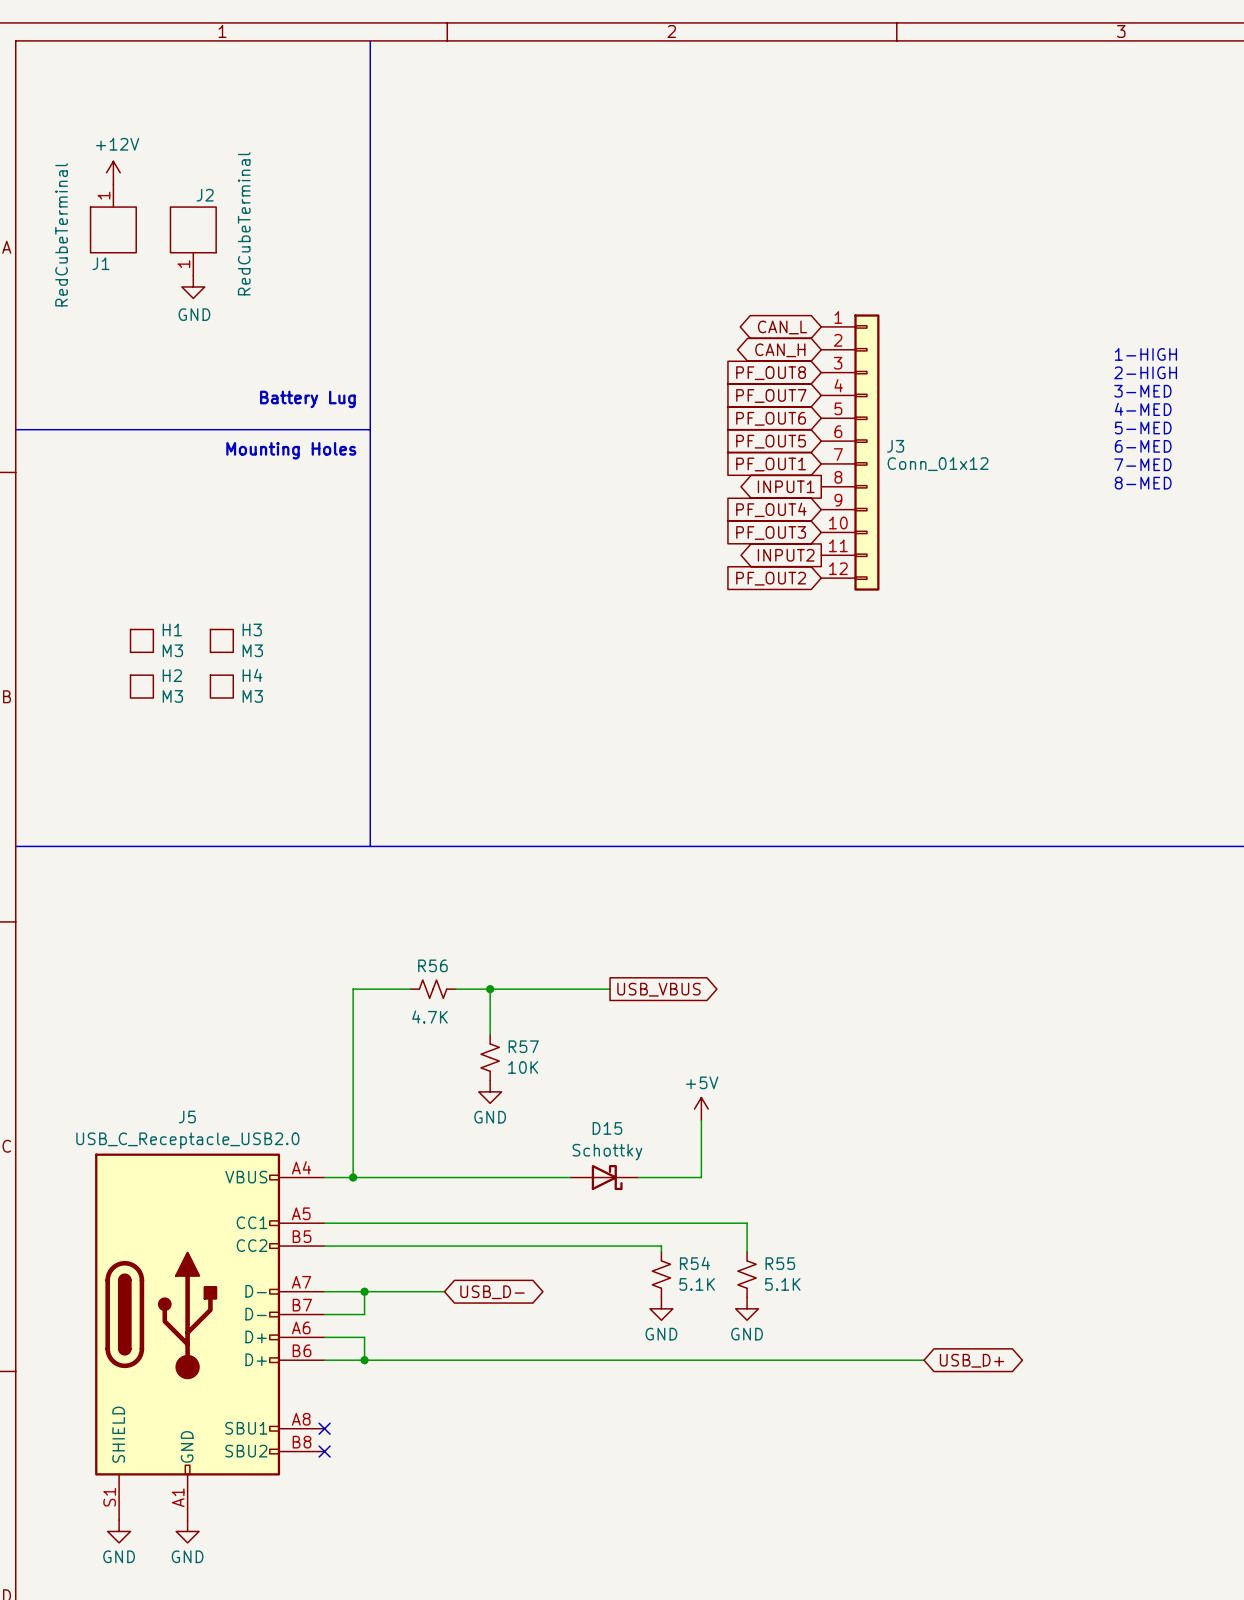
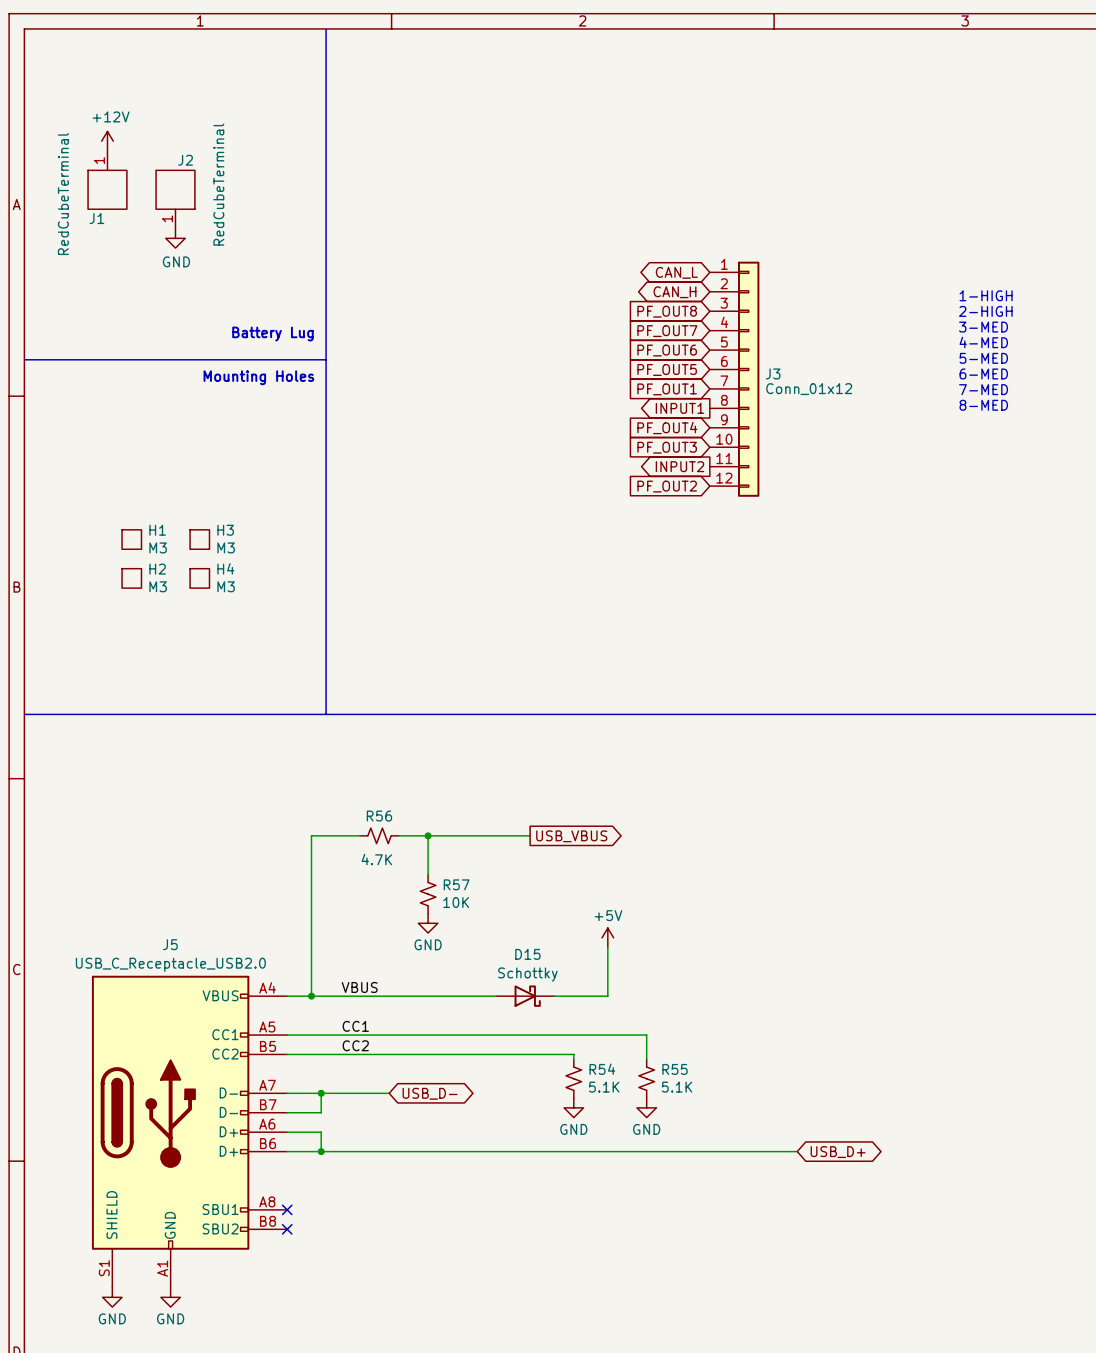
label: none -> VBUS (359, 987)
label: none -> CC1 (355, 1026)
label: none -> CC2 (355, 1045)

